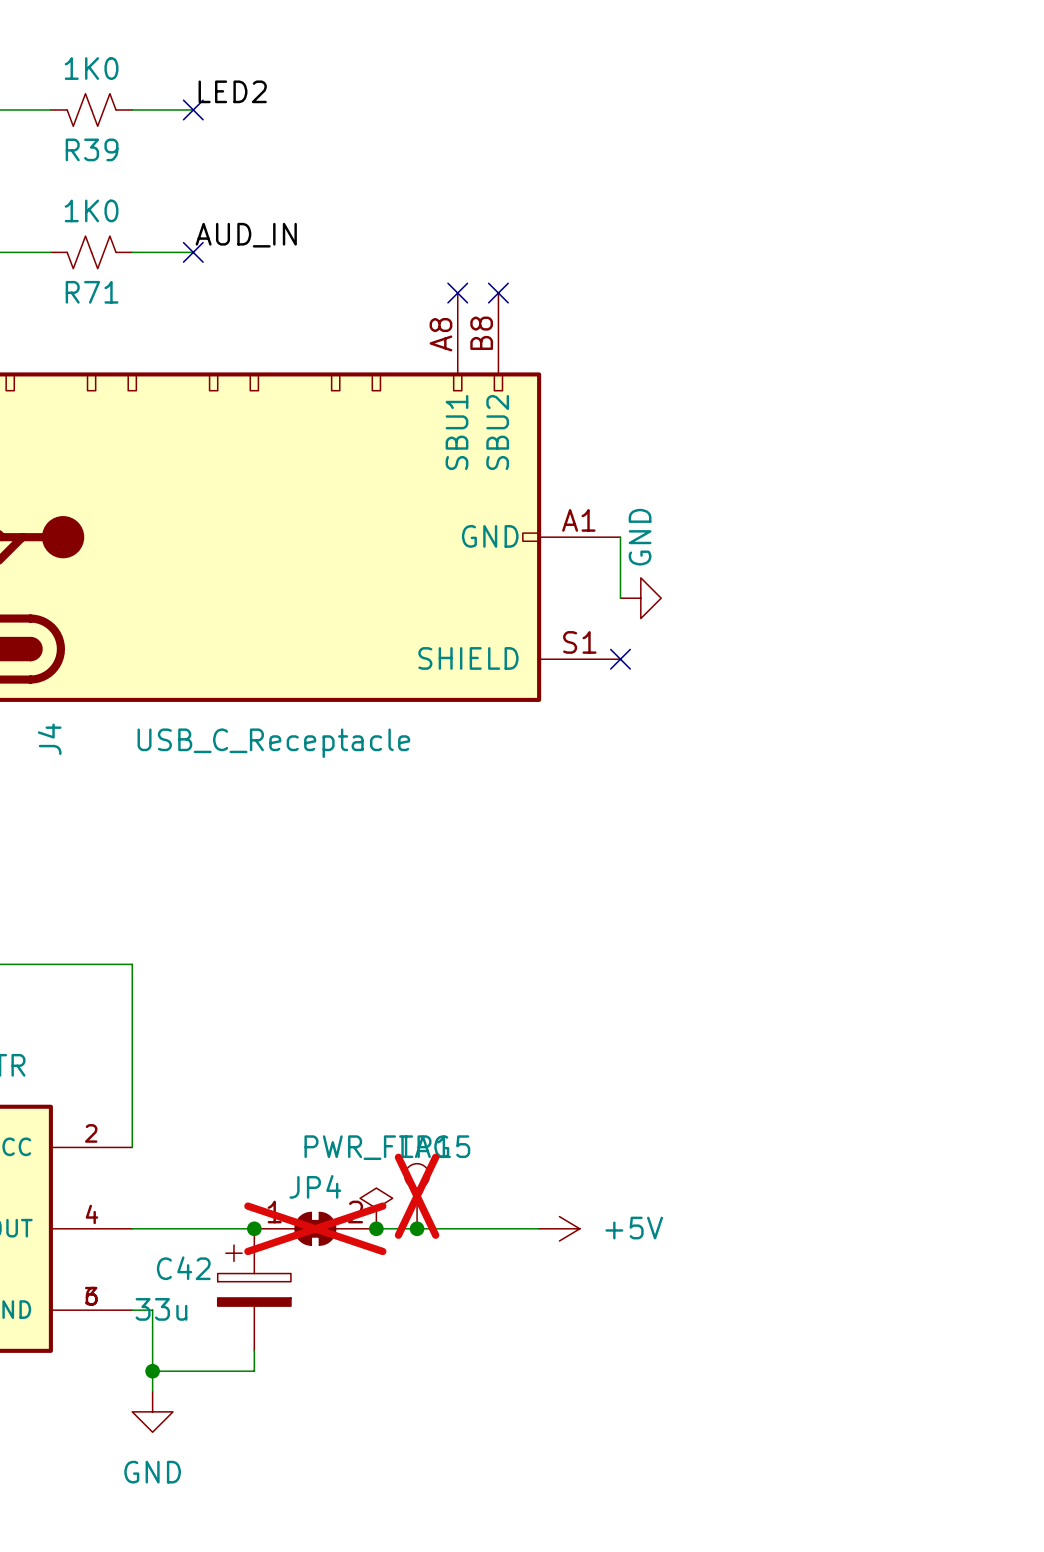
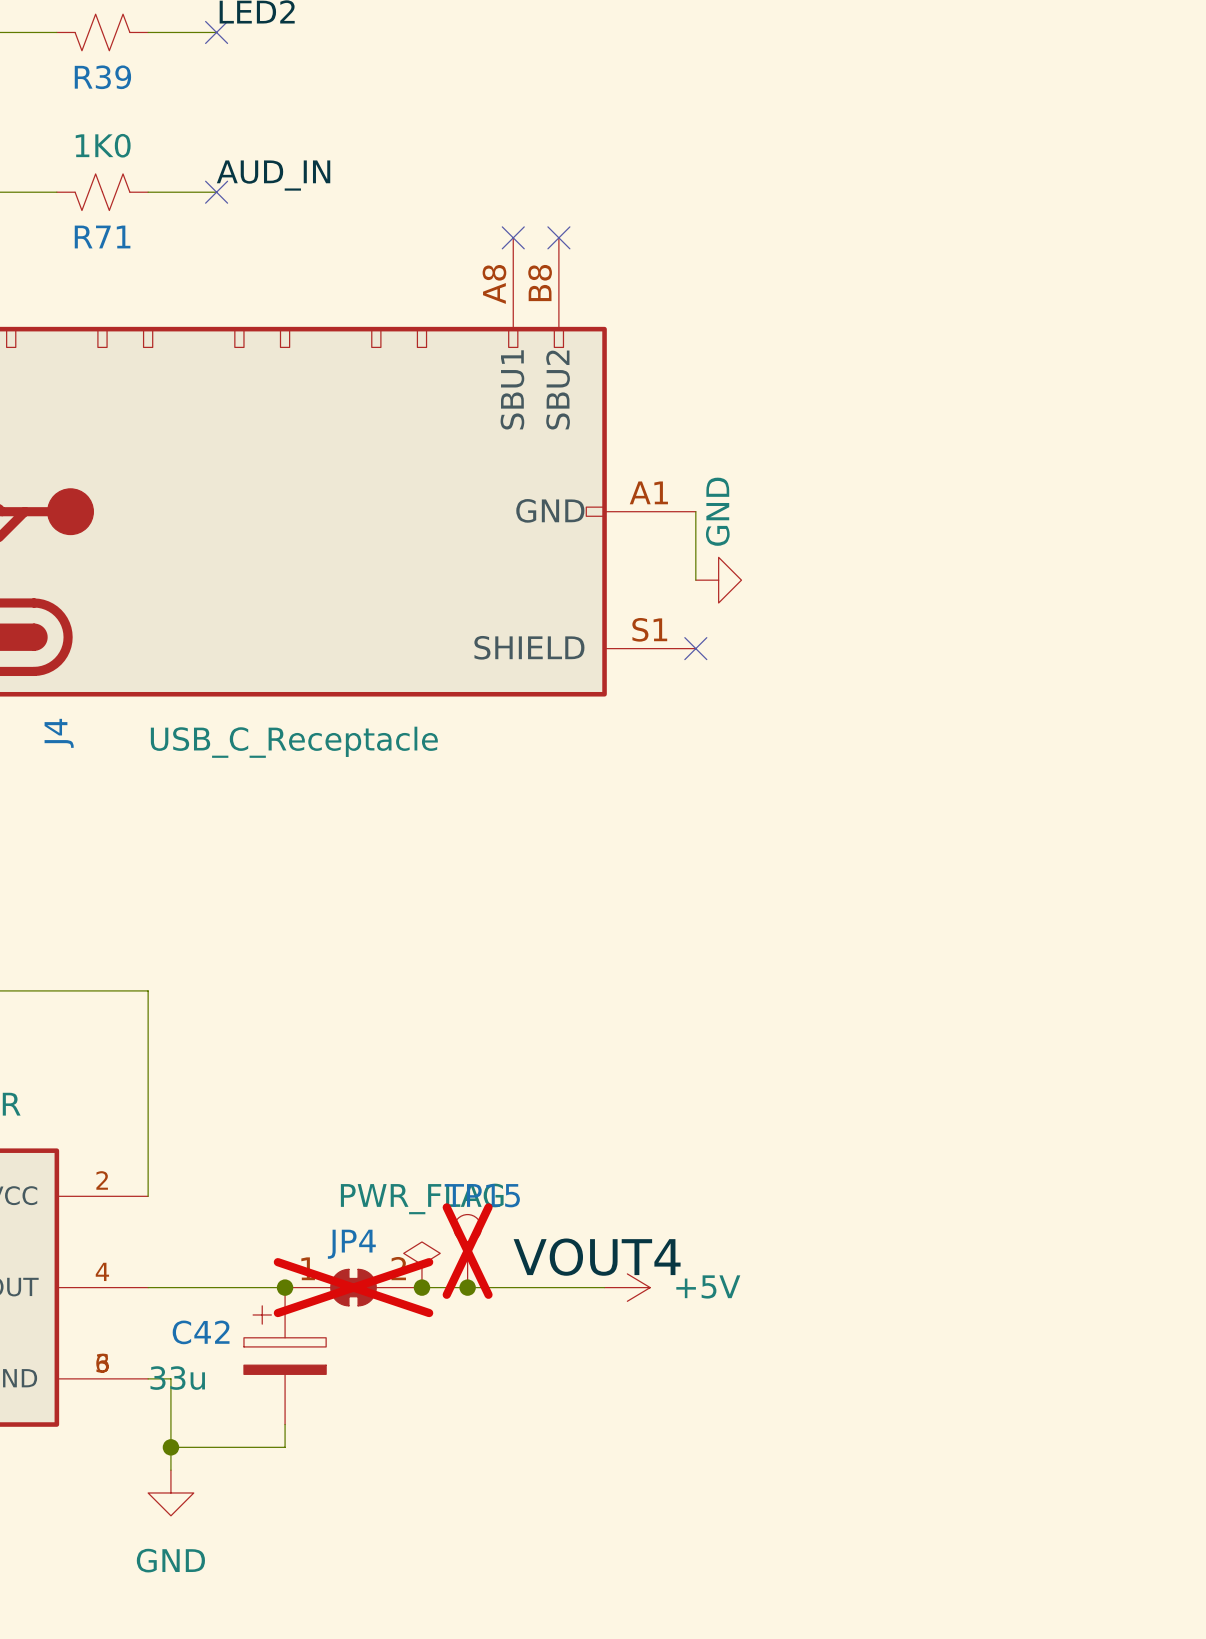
label: none -> VOUT4 (597, 1257)

